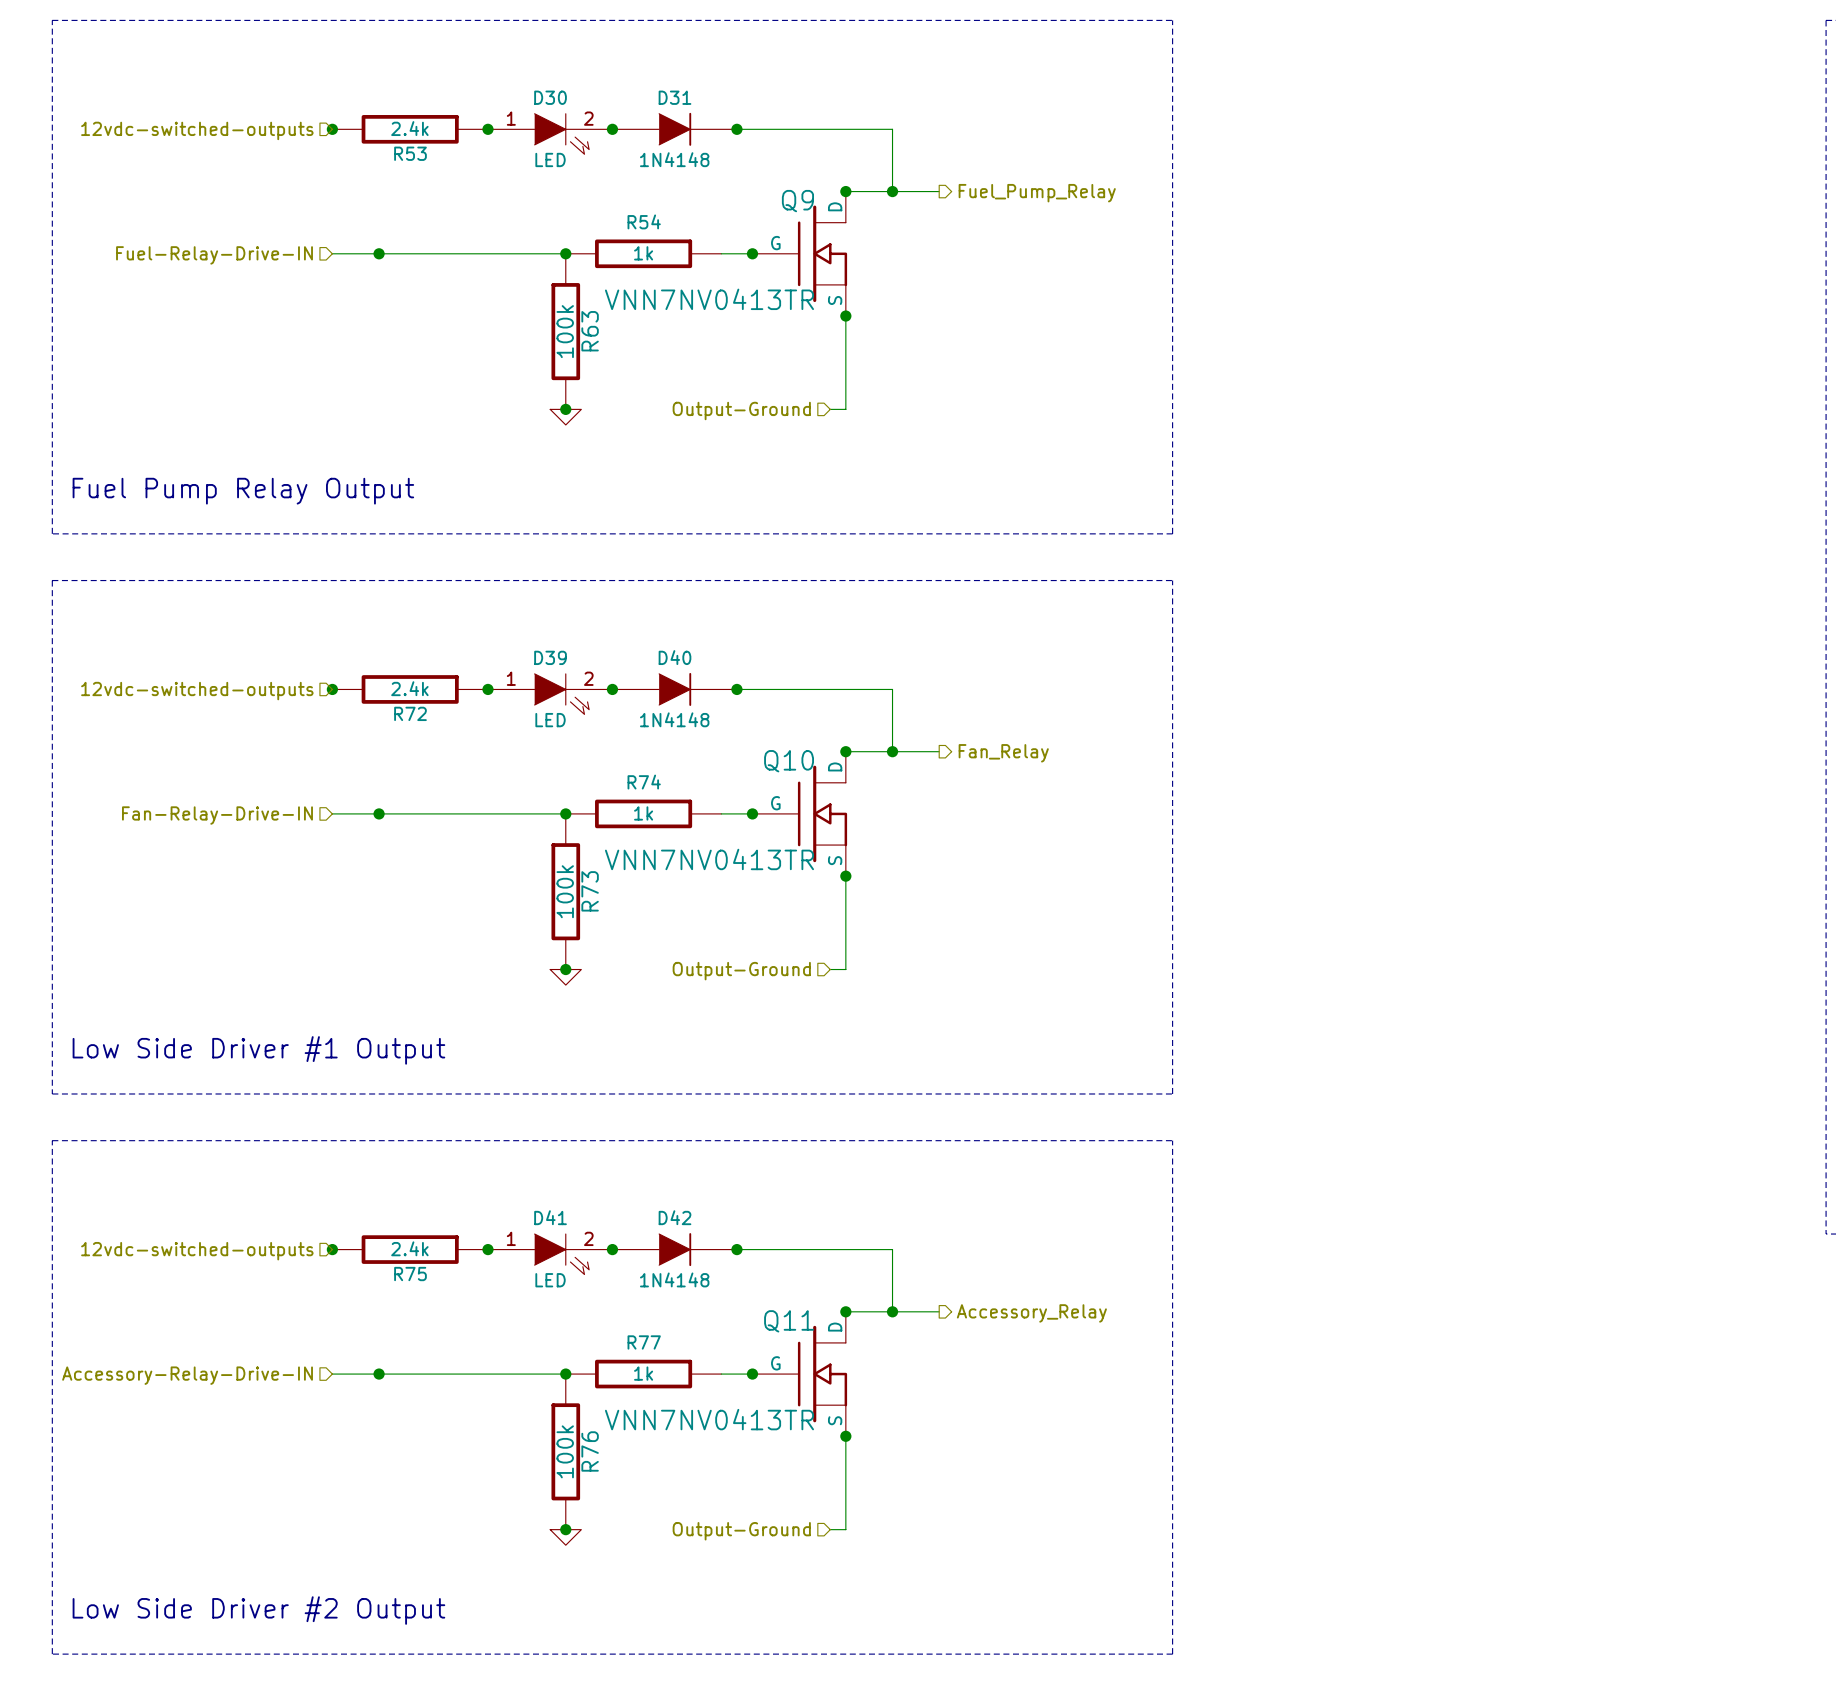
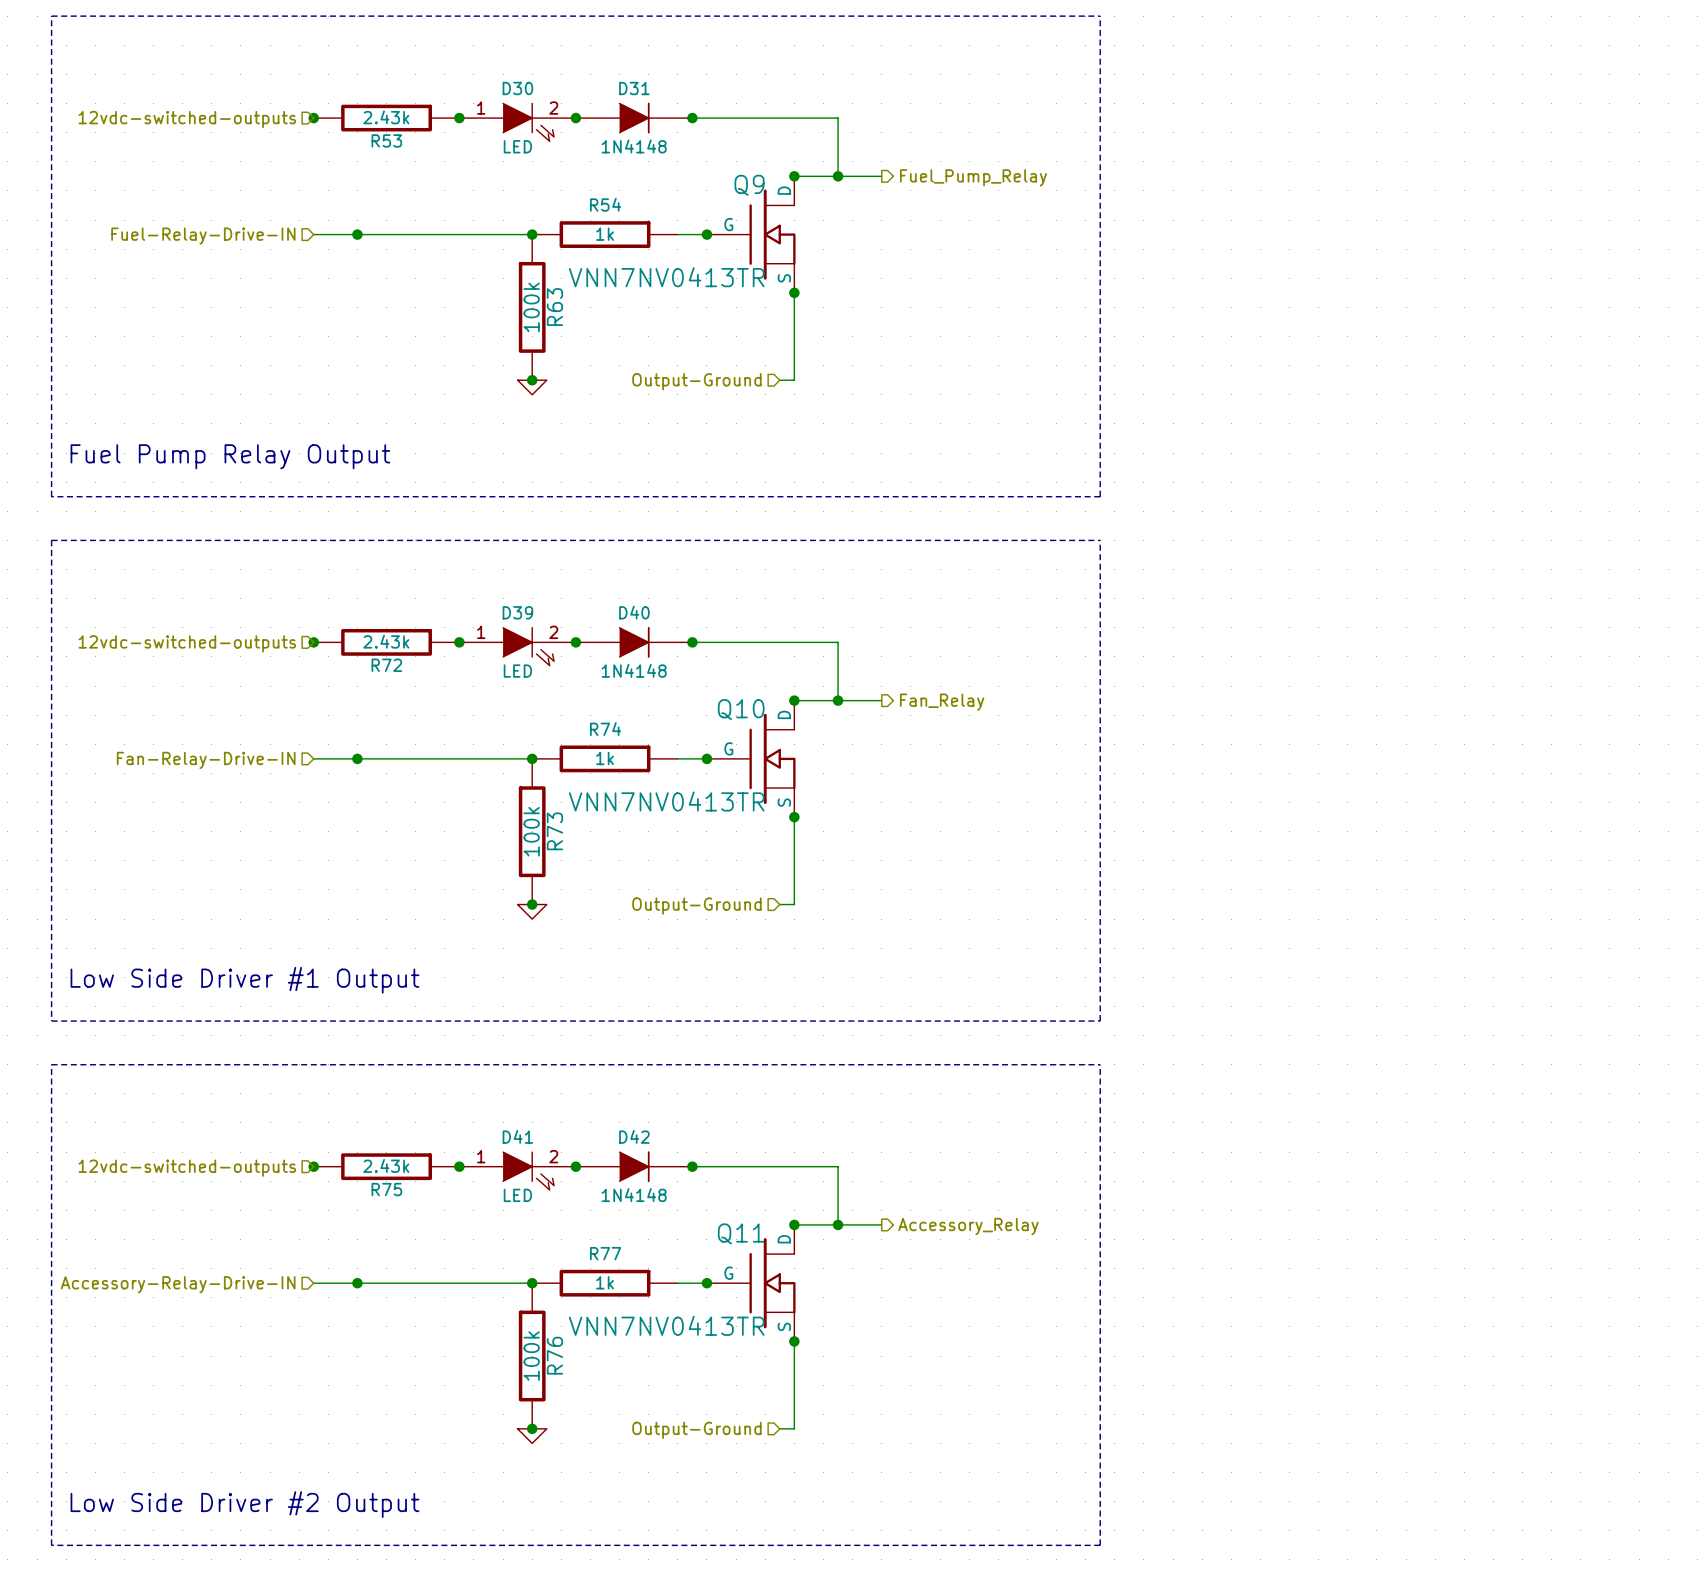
R53 value: 2.4k (409, 128) -> 2.43k (386, 117)
R72 value: 2.4k (409, 688) -> 2.43k (386, 641)
R75 value: 2.4k (409, 1248) -> 2.43k (386, 1165)

